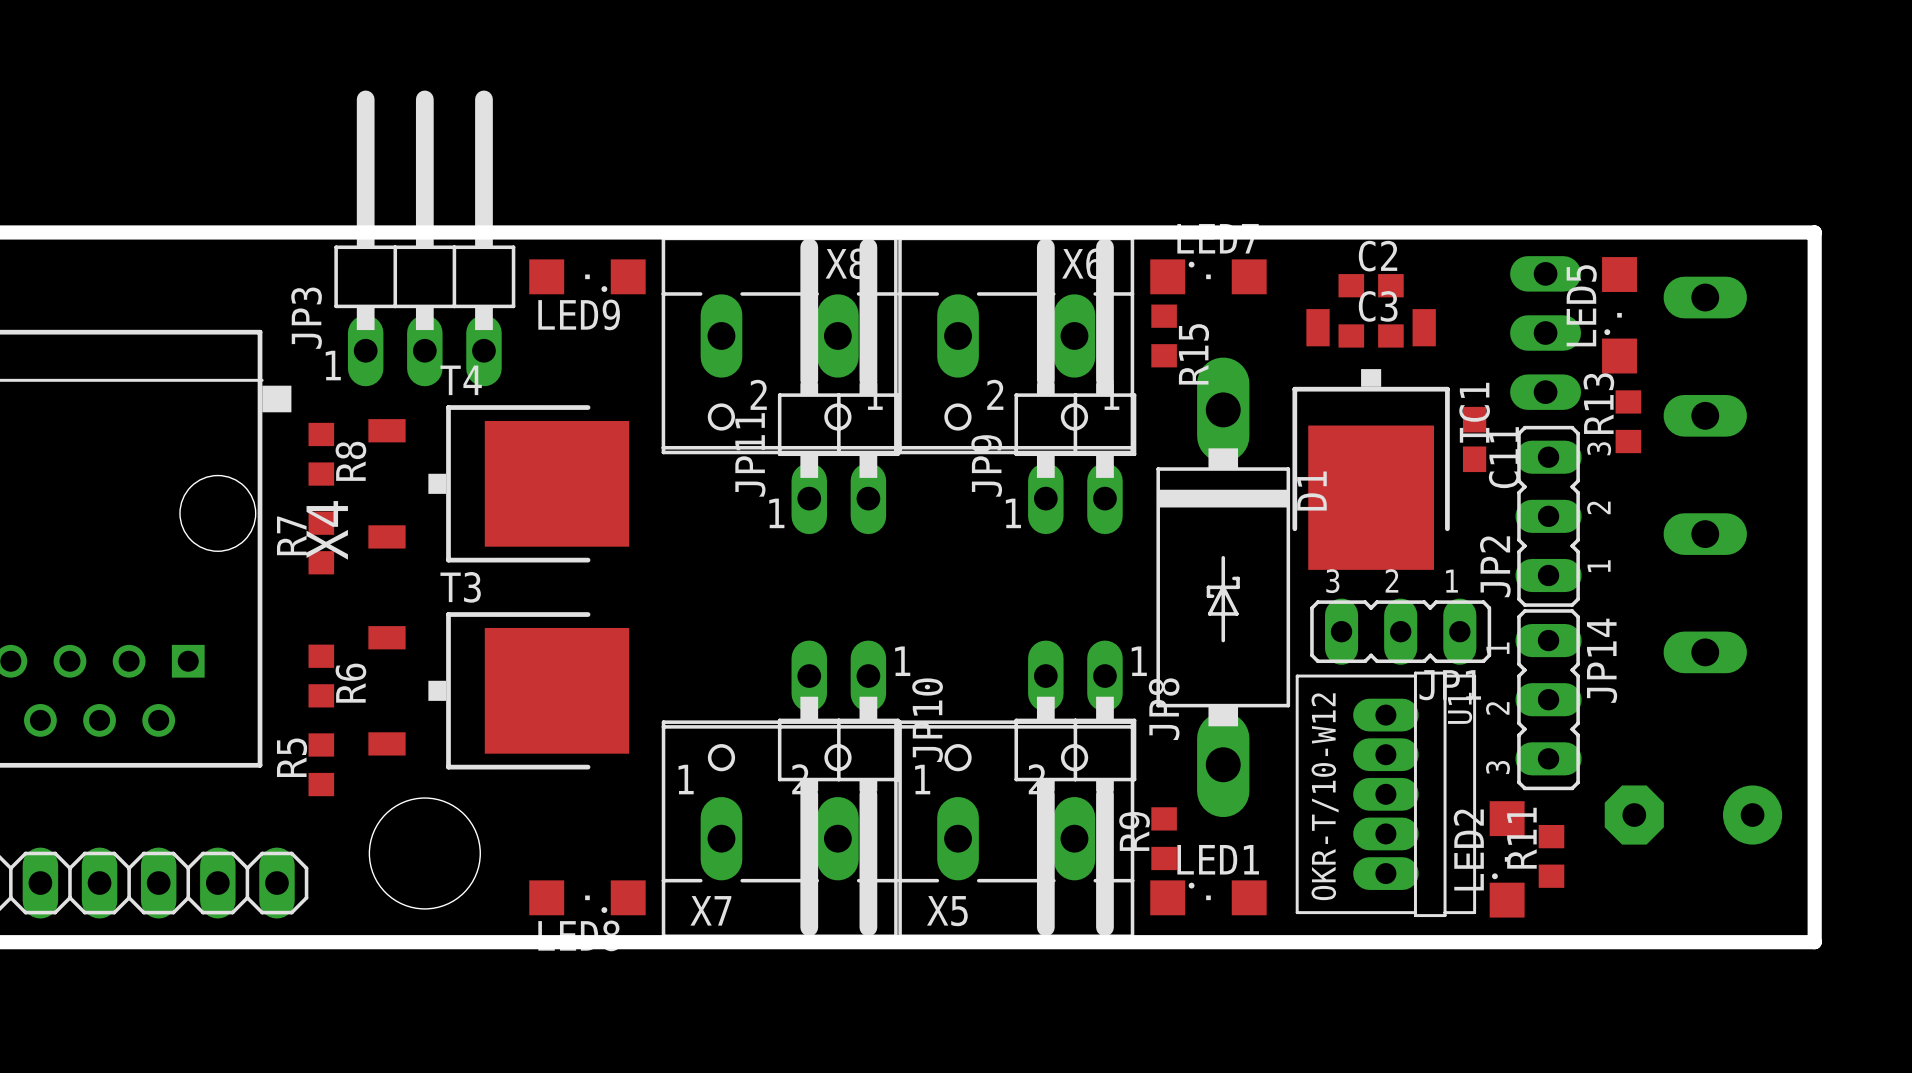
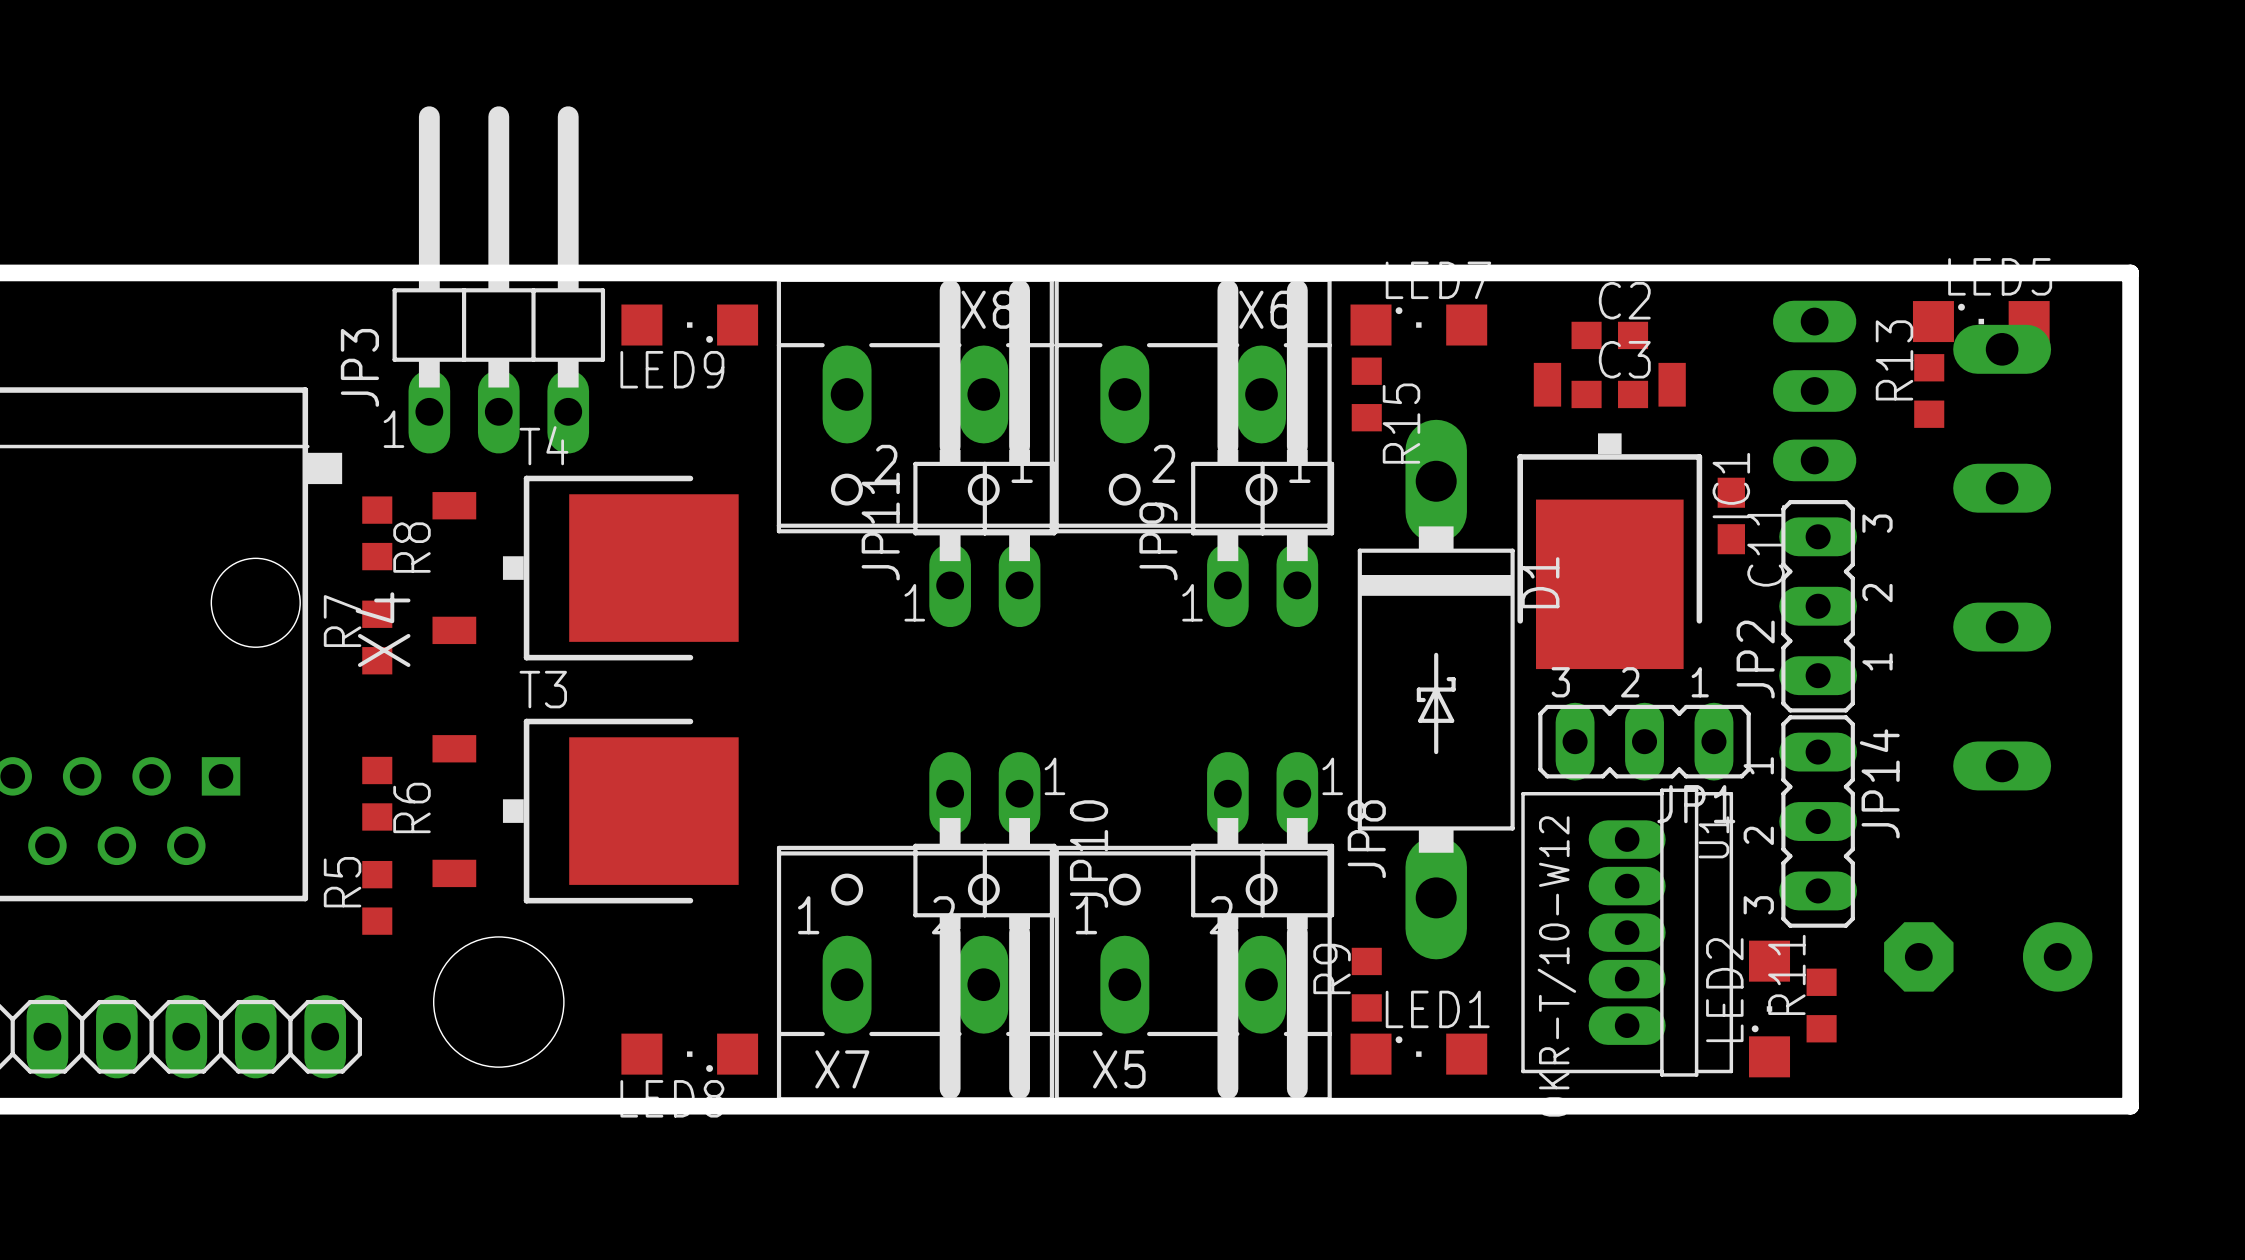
LED5 rotation: 0° (1619, 315) -> 90° clockwise (1981, 321)
LED5 position: (1619, 315) -> (1981, 321)
R13 position: (1628, 421) -> (1929, 390)

